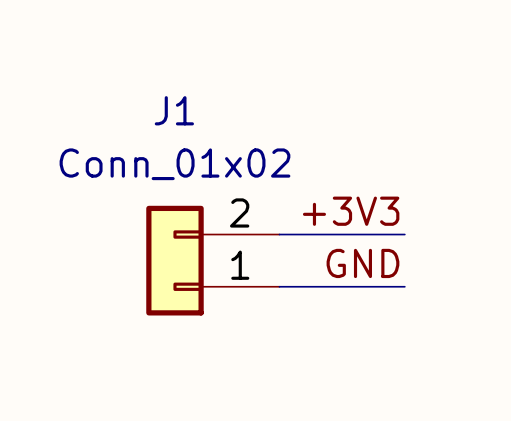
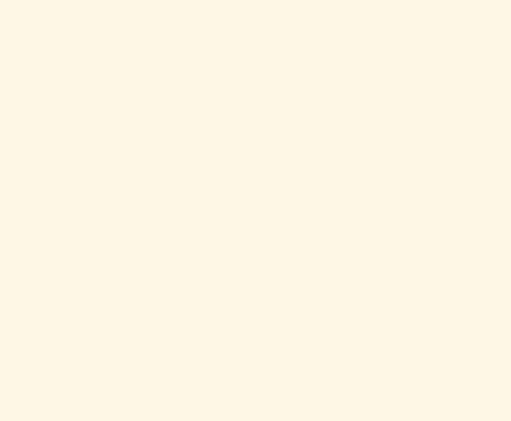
label: +3V3 (351, 211) -> none
wire: (279, 234) (404, 234) -> none
J1: Conn_01x02 (212, 260) -> none
label: GND (362, 263) -> none
wire: (279, 286) (404, 286) -> none

